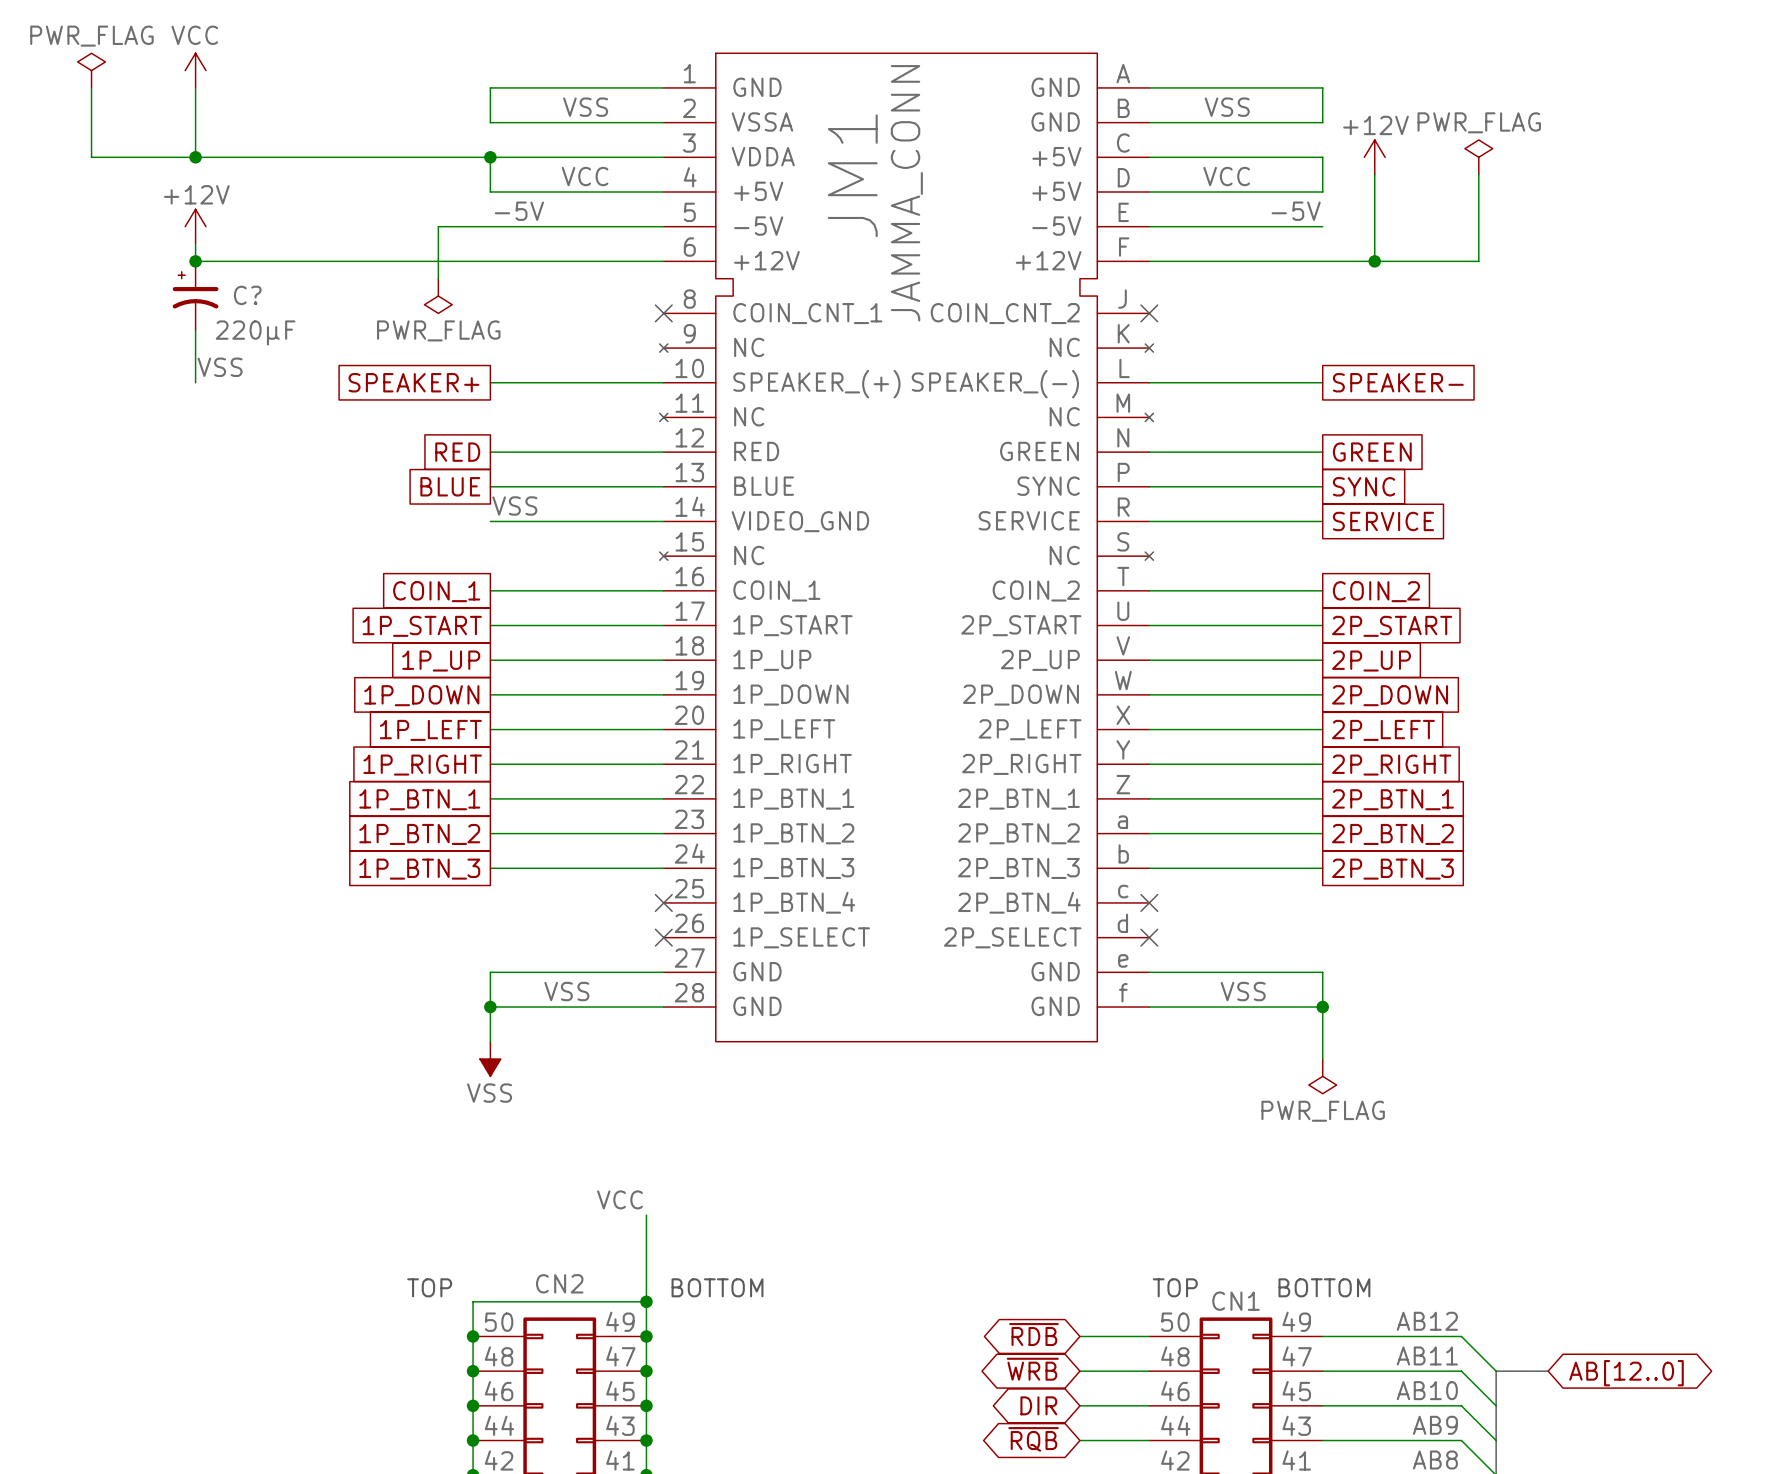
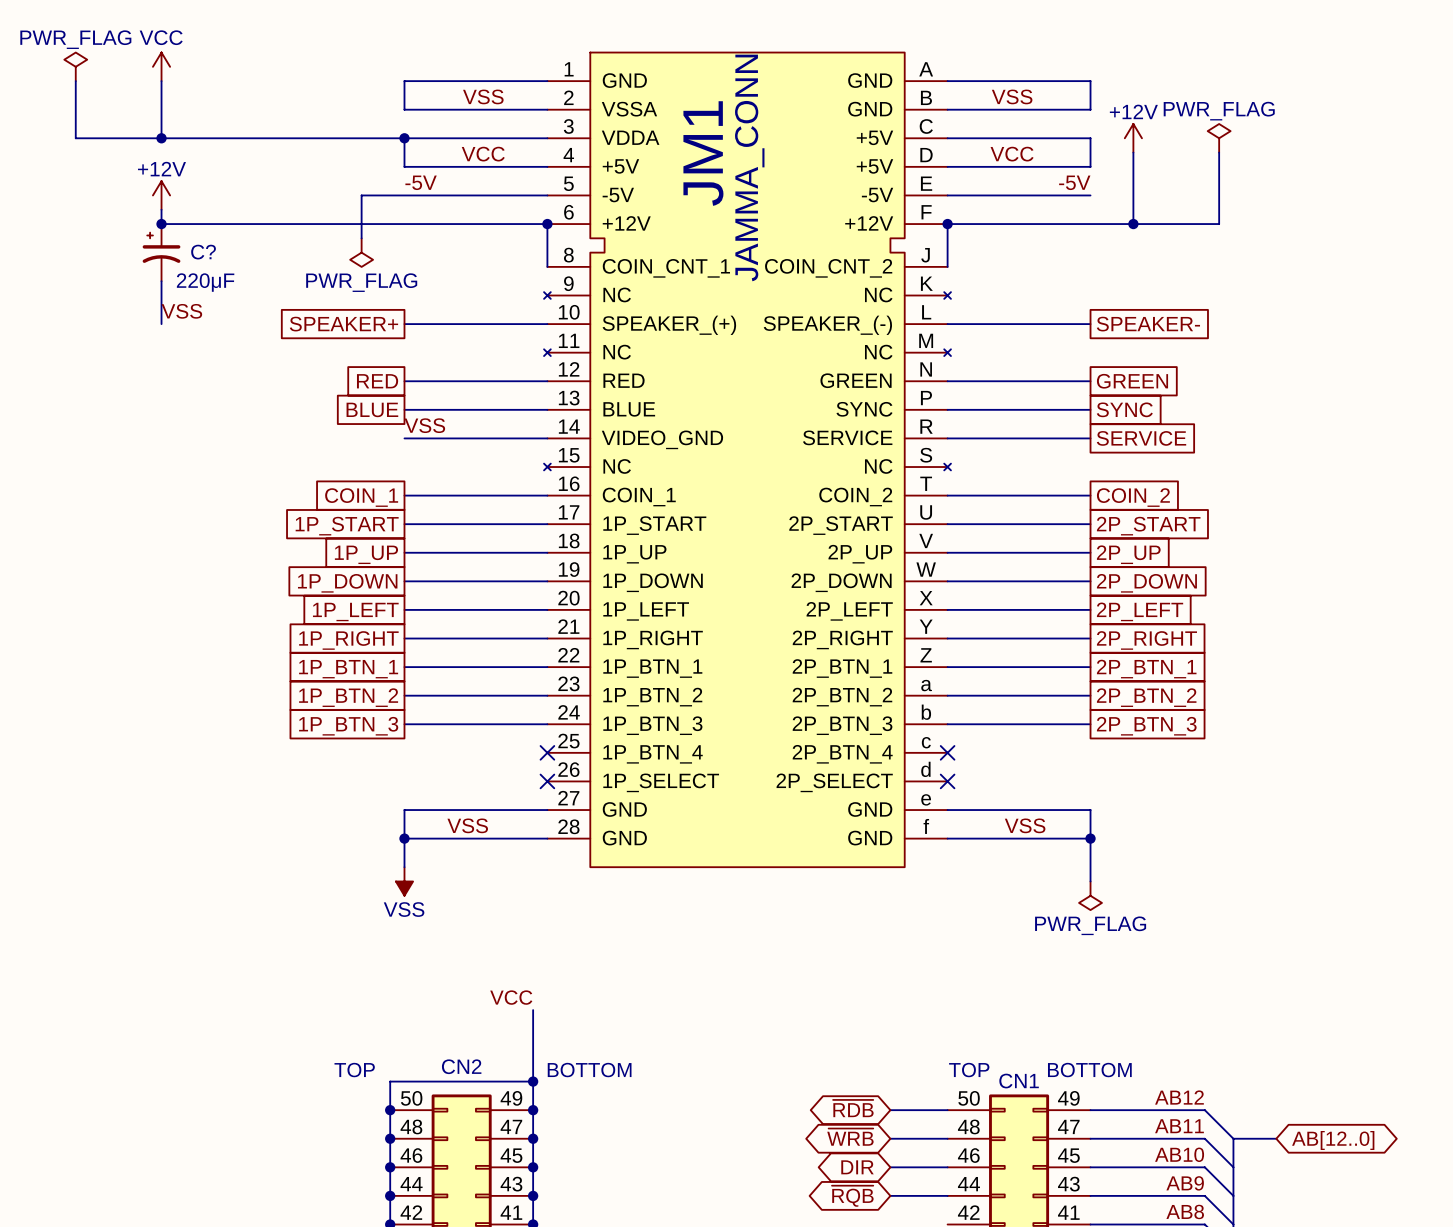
wire: none -> (547, 224) (547, 266)
junction: none -> (547, 224)
wire: none -> (947, 224) (947, 266)
junction: none -> (947, 224)
no-connect mark: (663, 313) -> none
no-connect mark: (1149, 313) -> none

